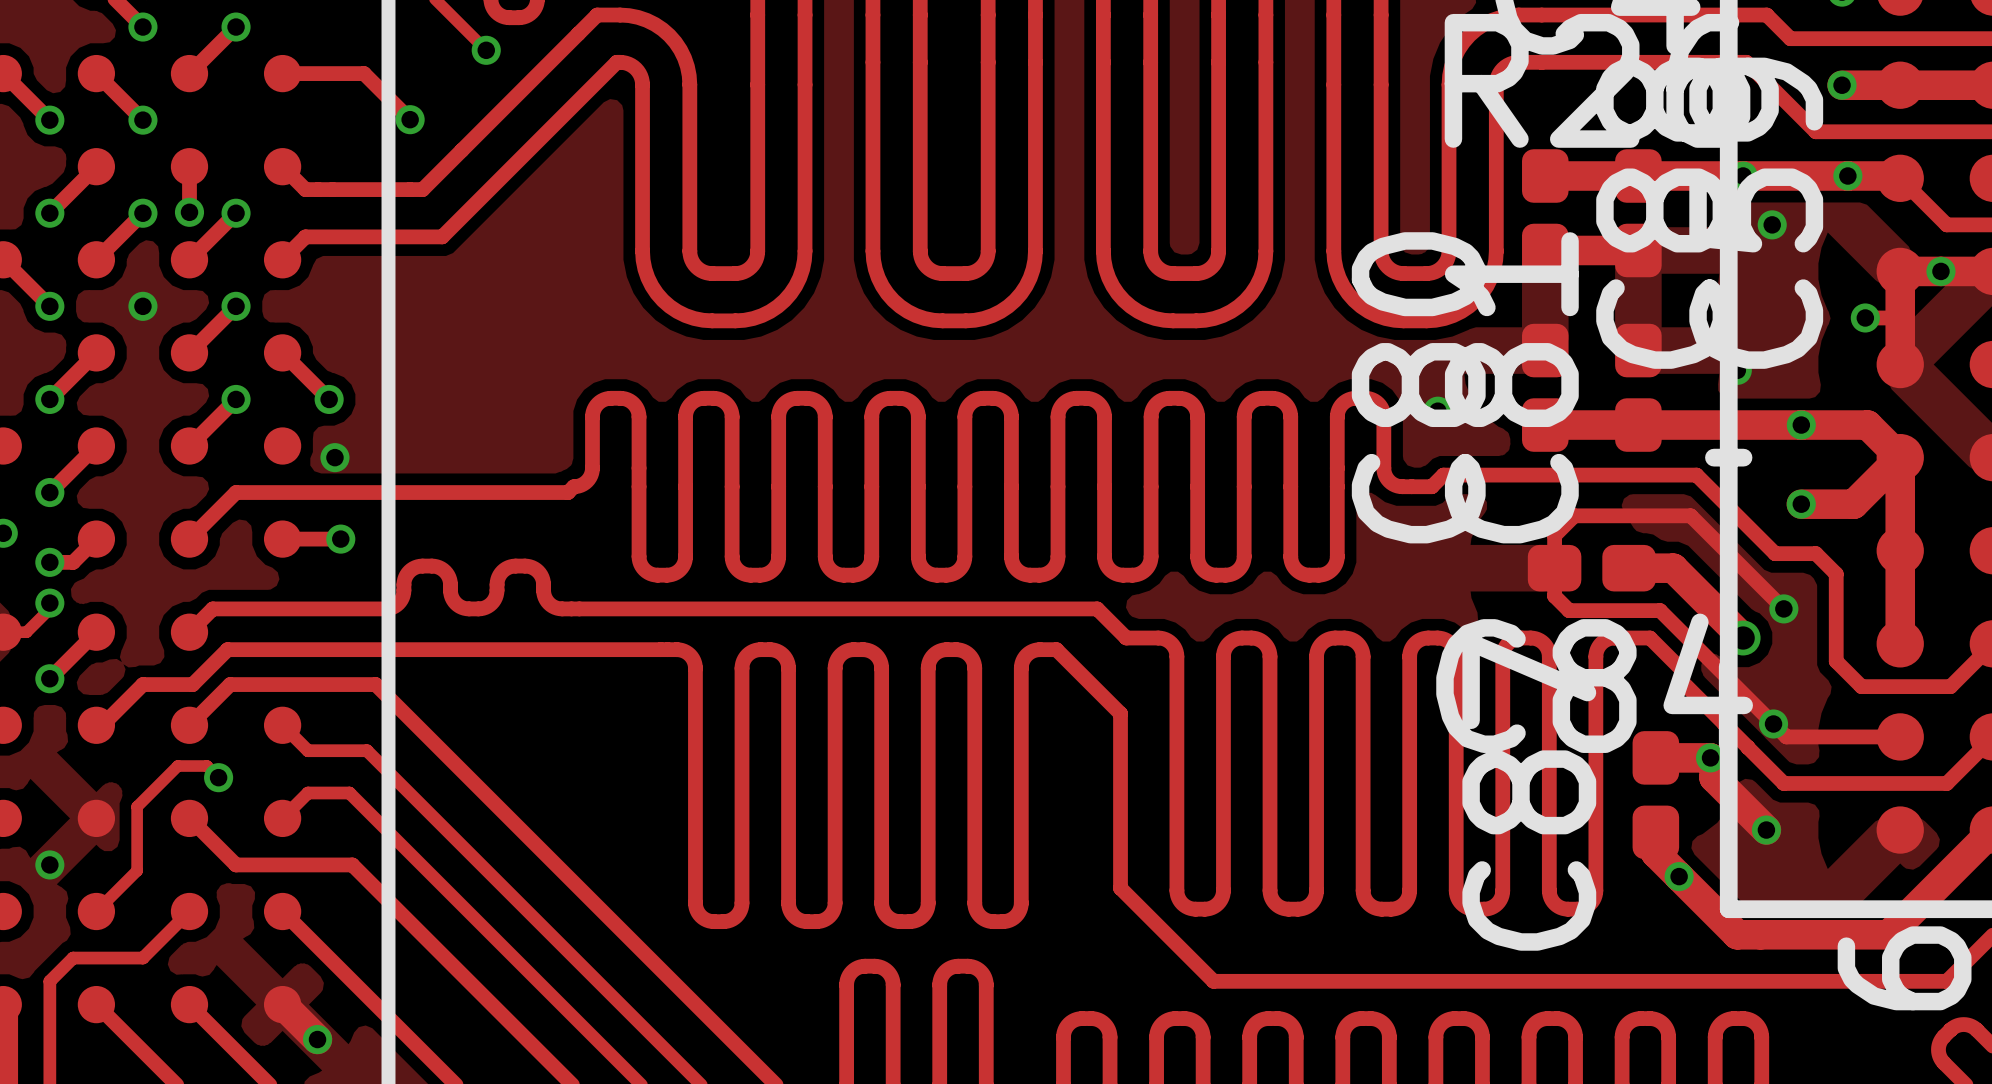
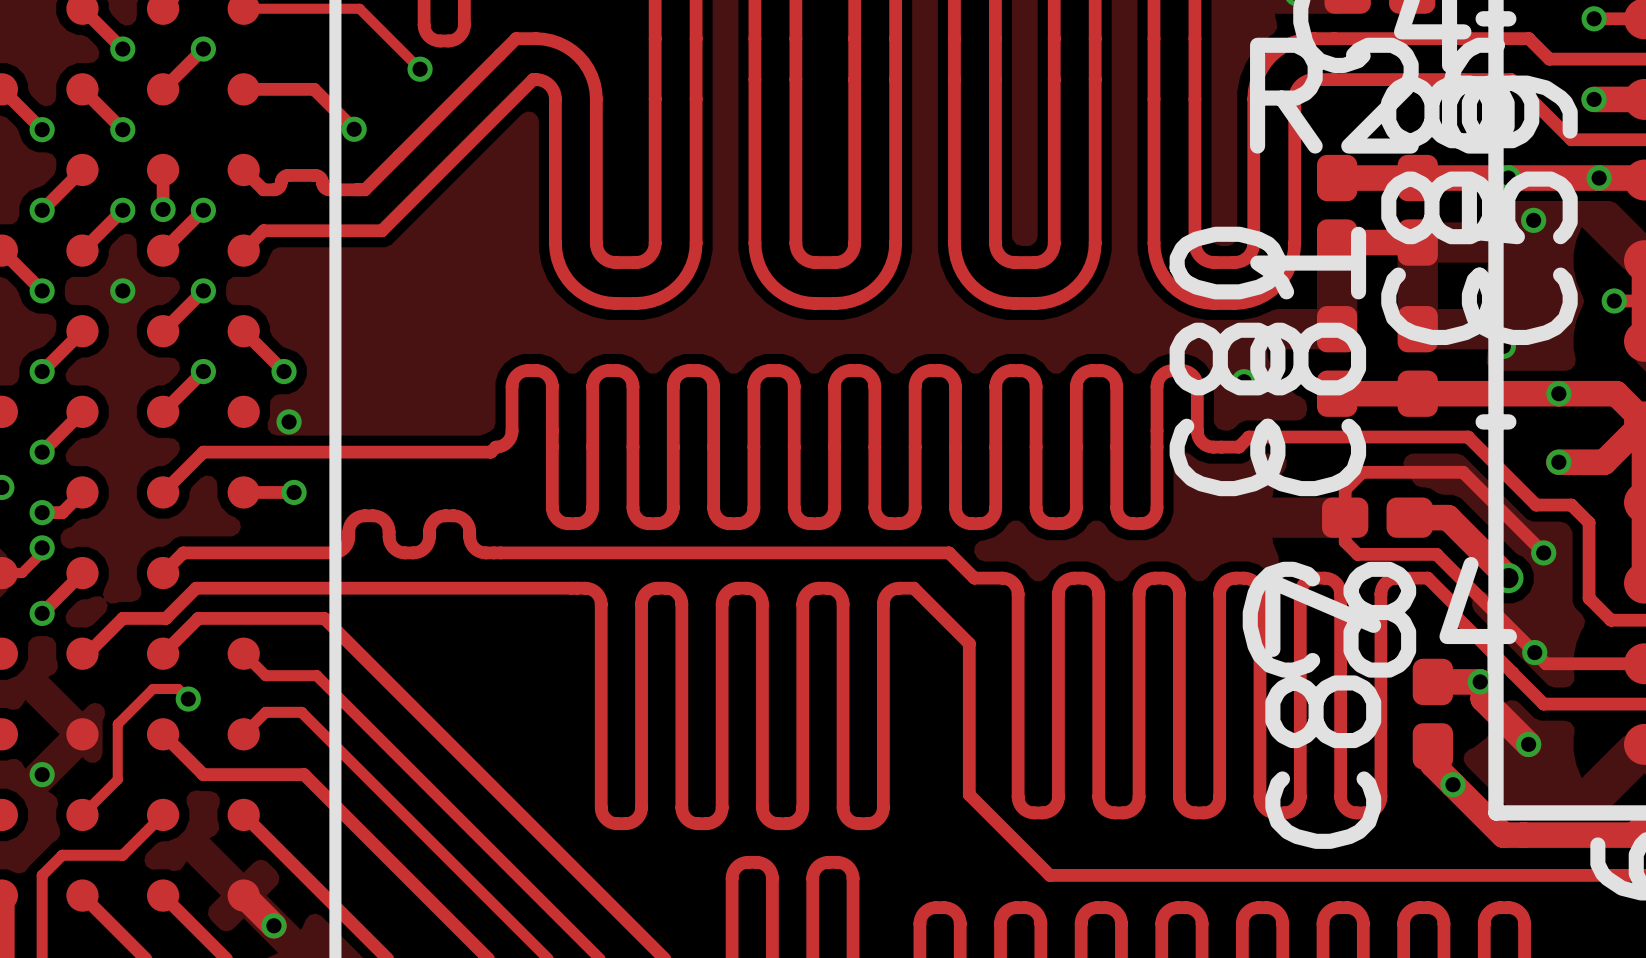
track: (317, 189) (381, 189) -> (273, 189) (279, 187) (282, 178) (288, 175) (317, 175) (321, 178) (324, 187) (329, 189)

